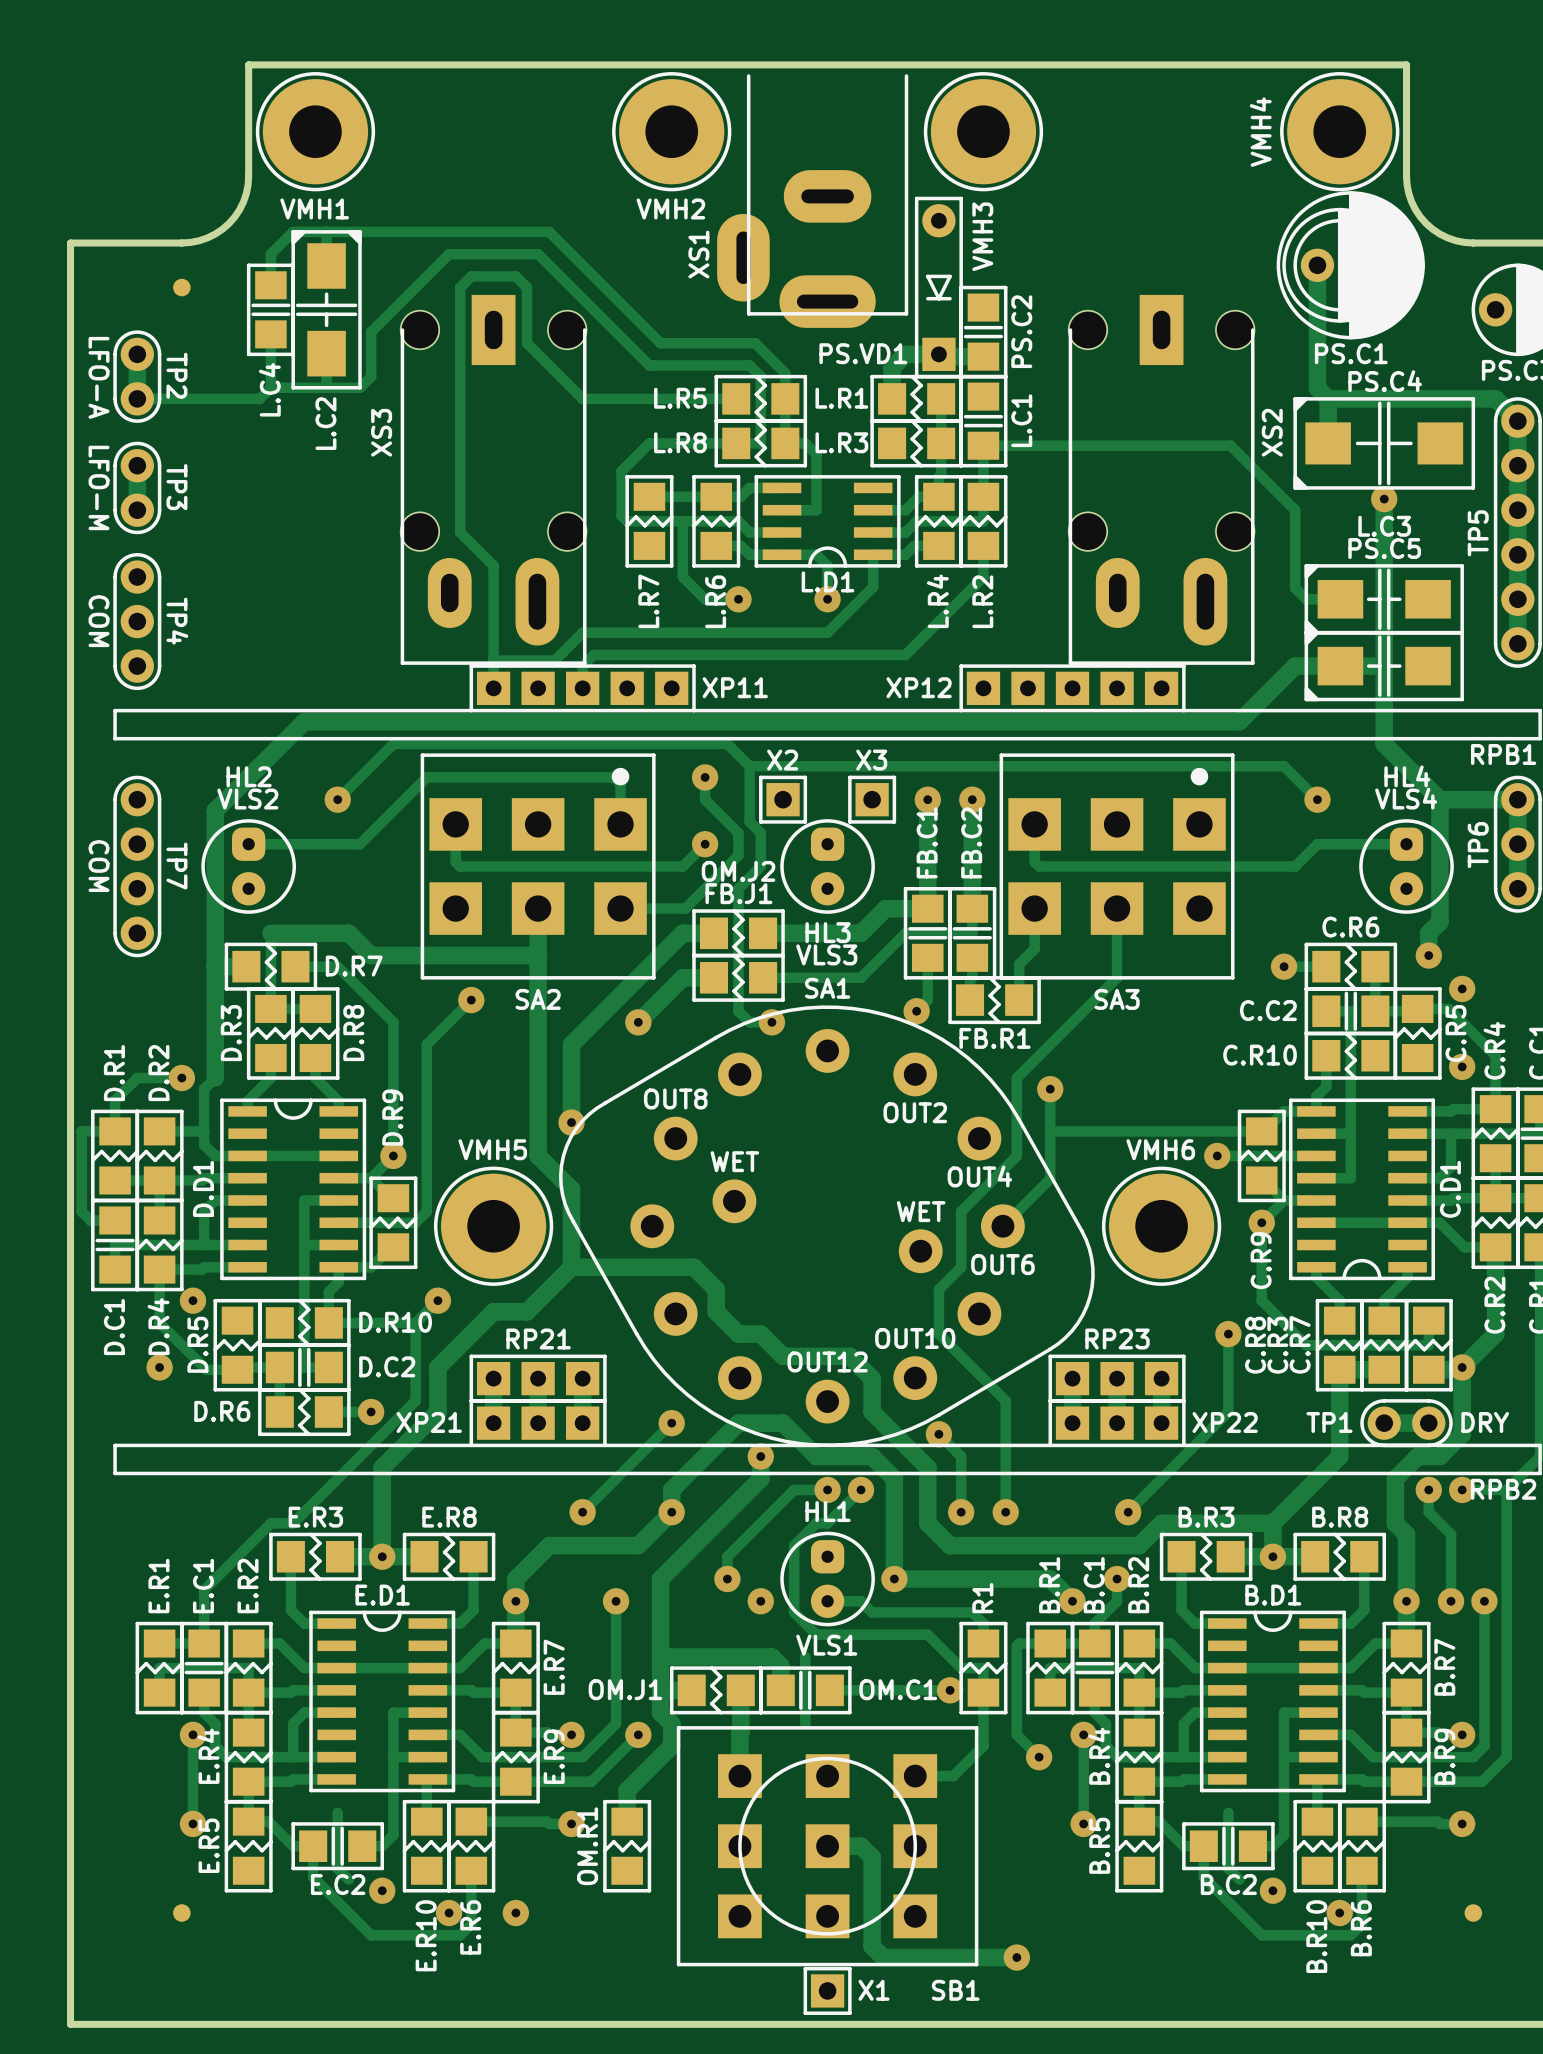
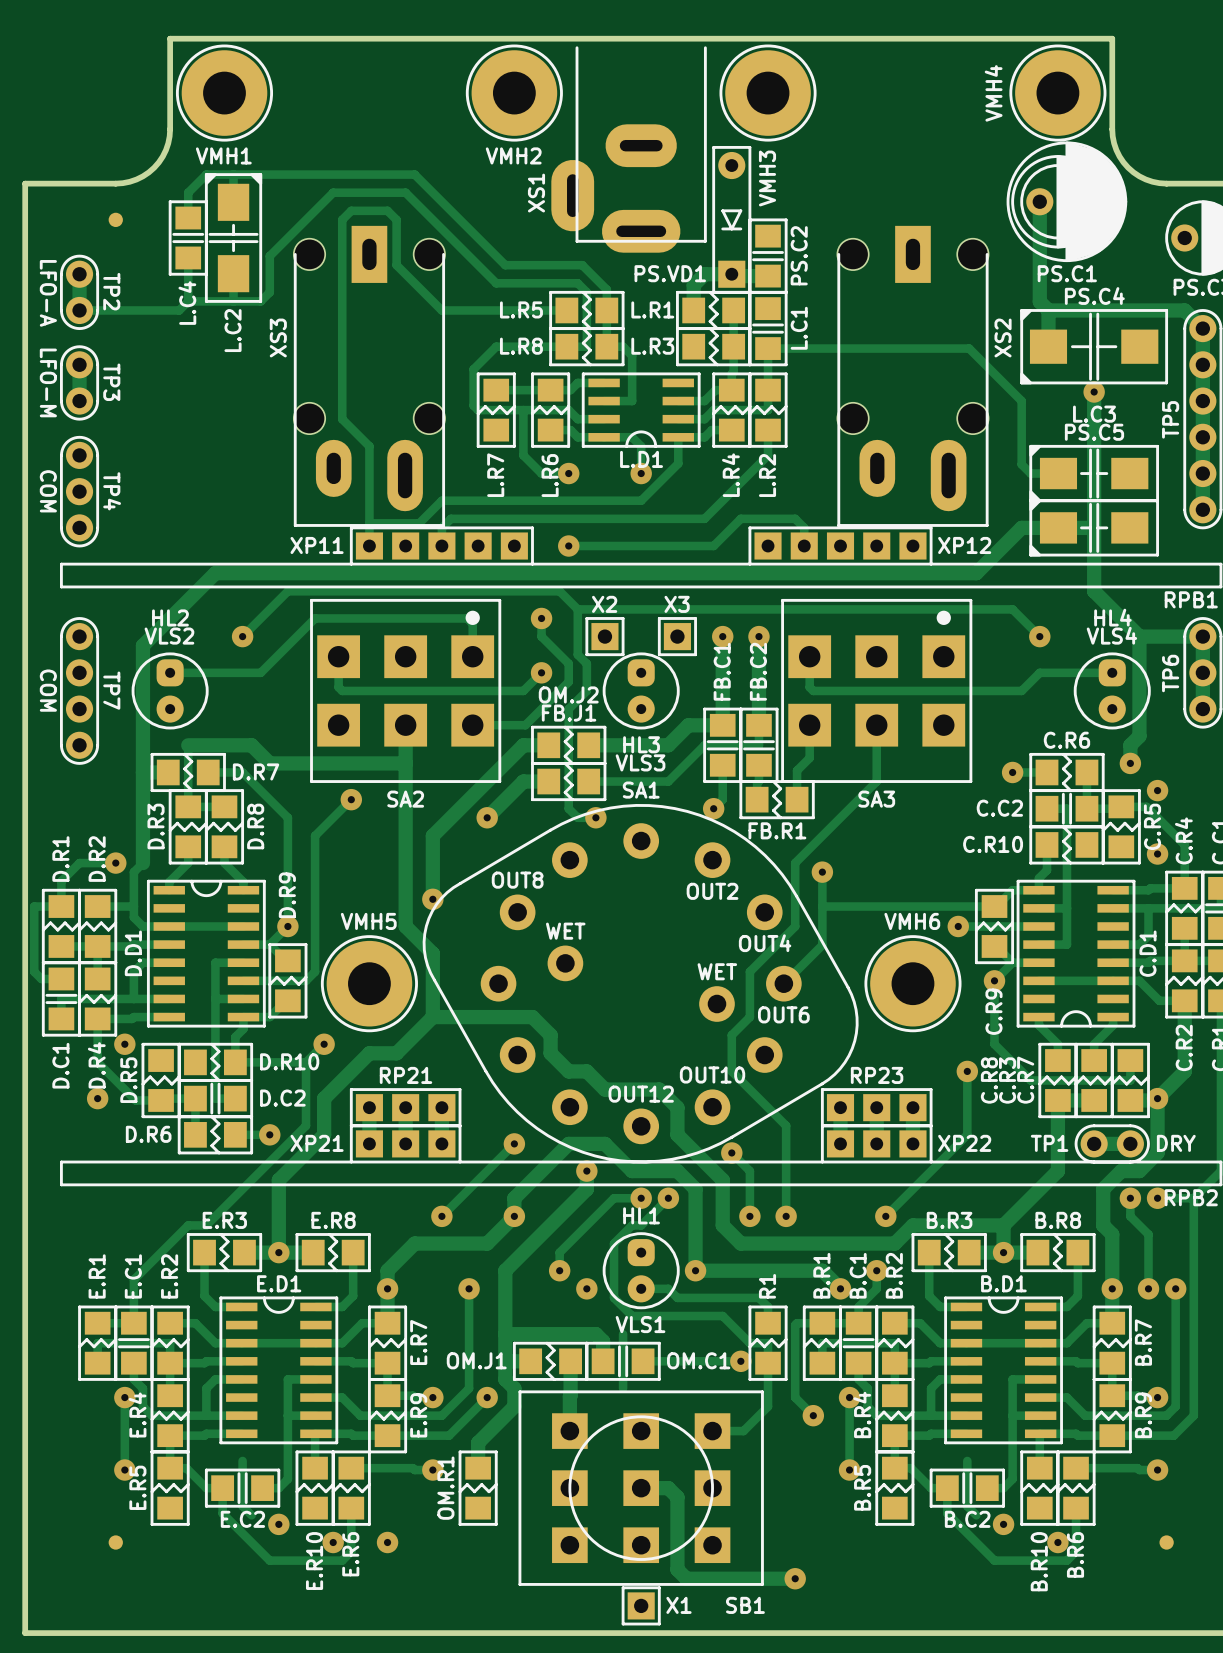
RPB1 text position: XP11 (735, 687) -> XP11 (317, 545)
RPB1 text position: XP12 (919, 687) -> XP12 (964, 545)
track: none -> (568, 546) (713, 546) (740, 518) (795, 518) (804, 527) (804, 546)
via: none -> (568, 546)

